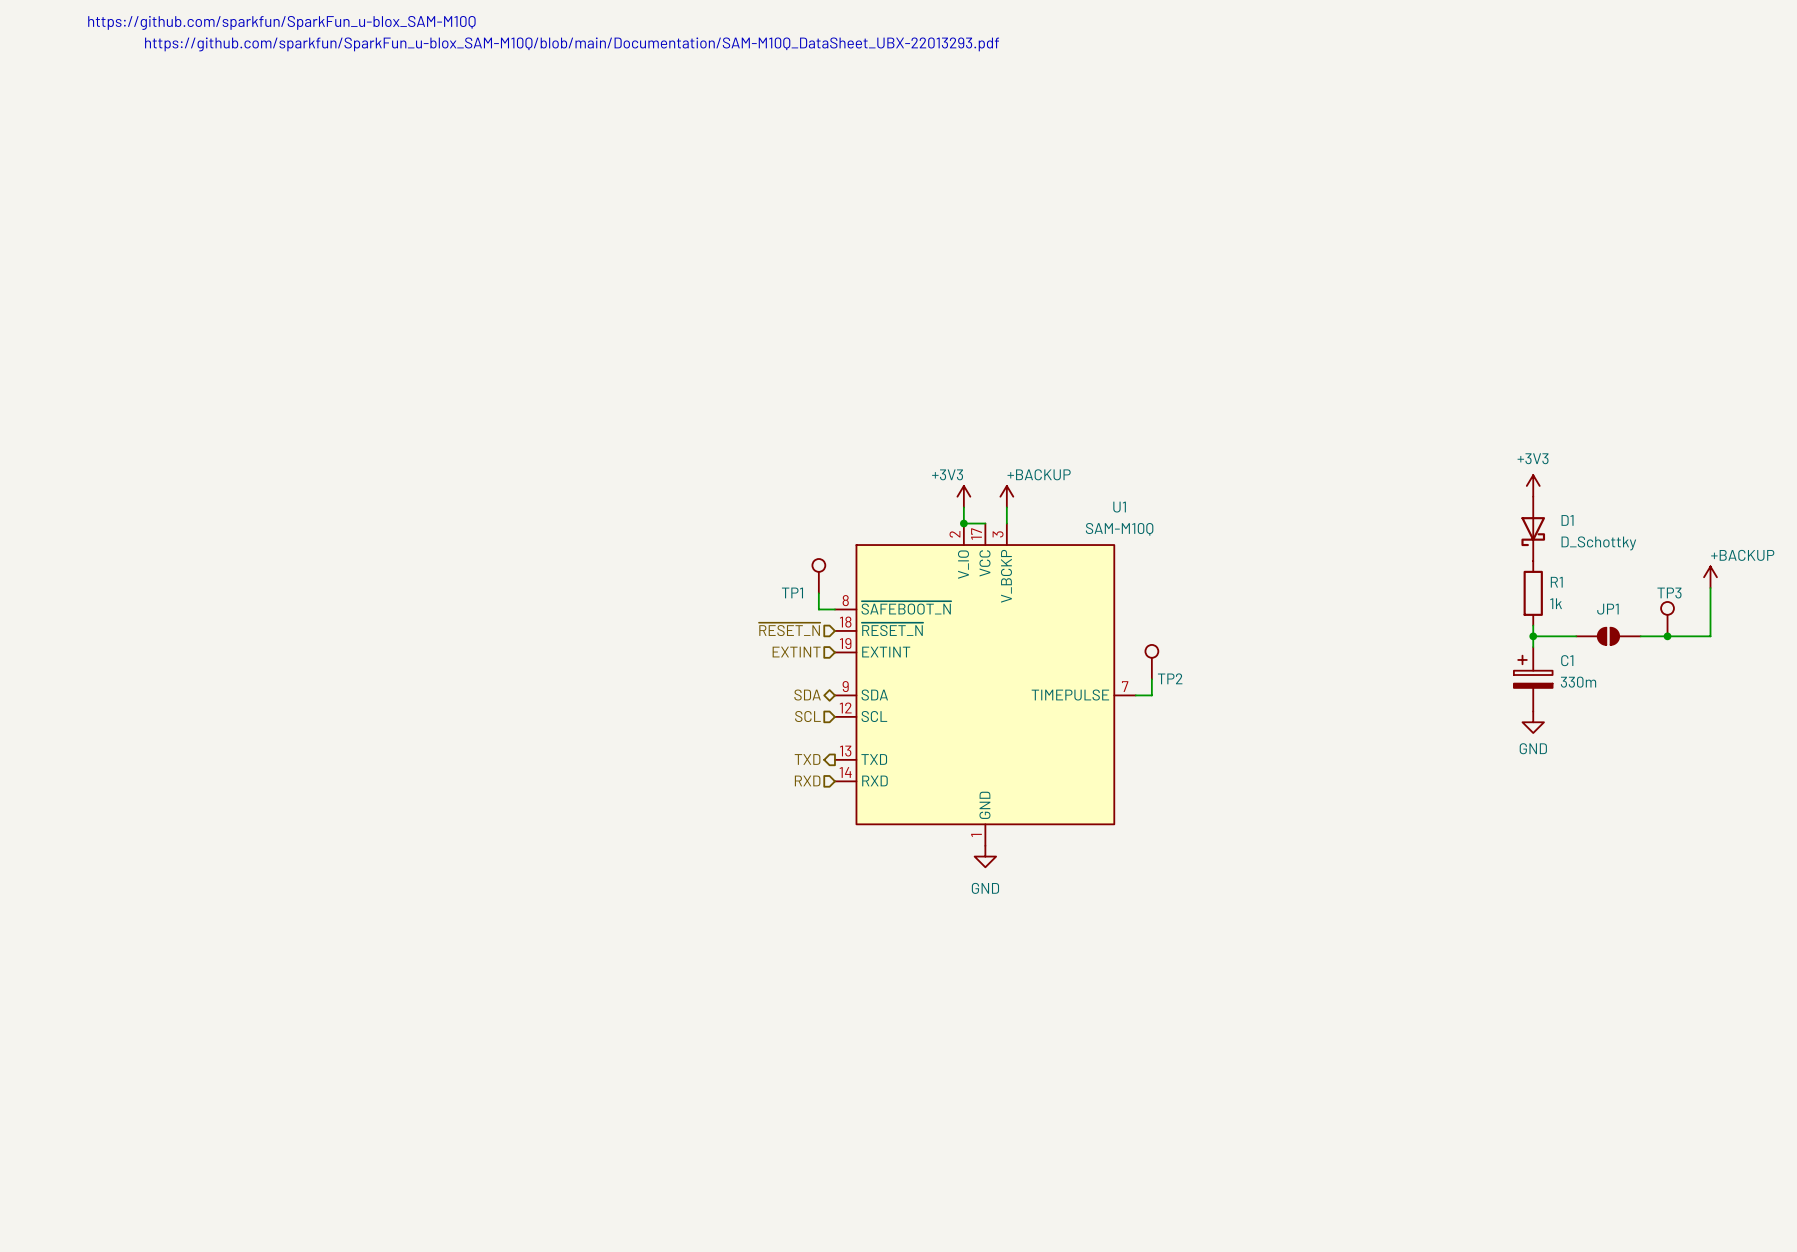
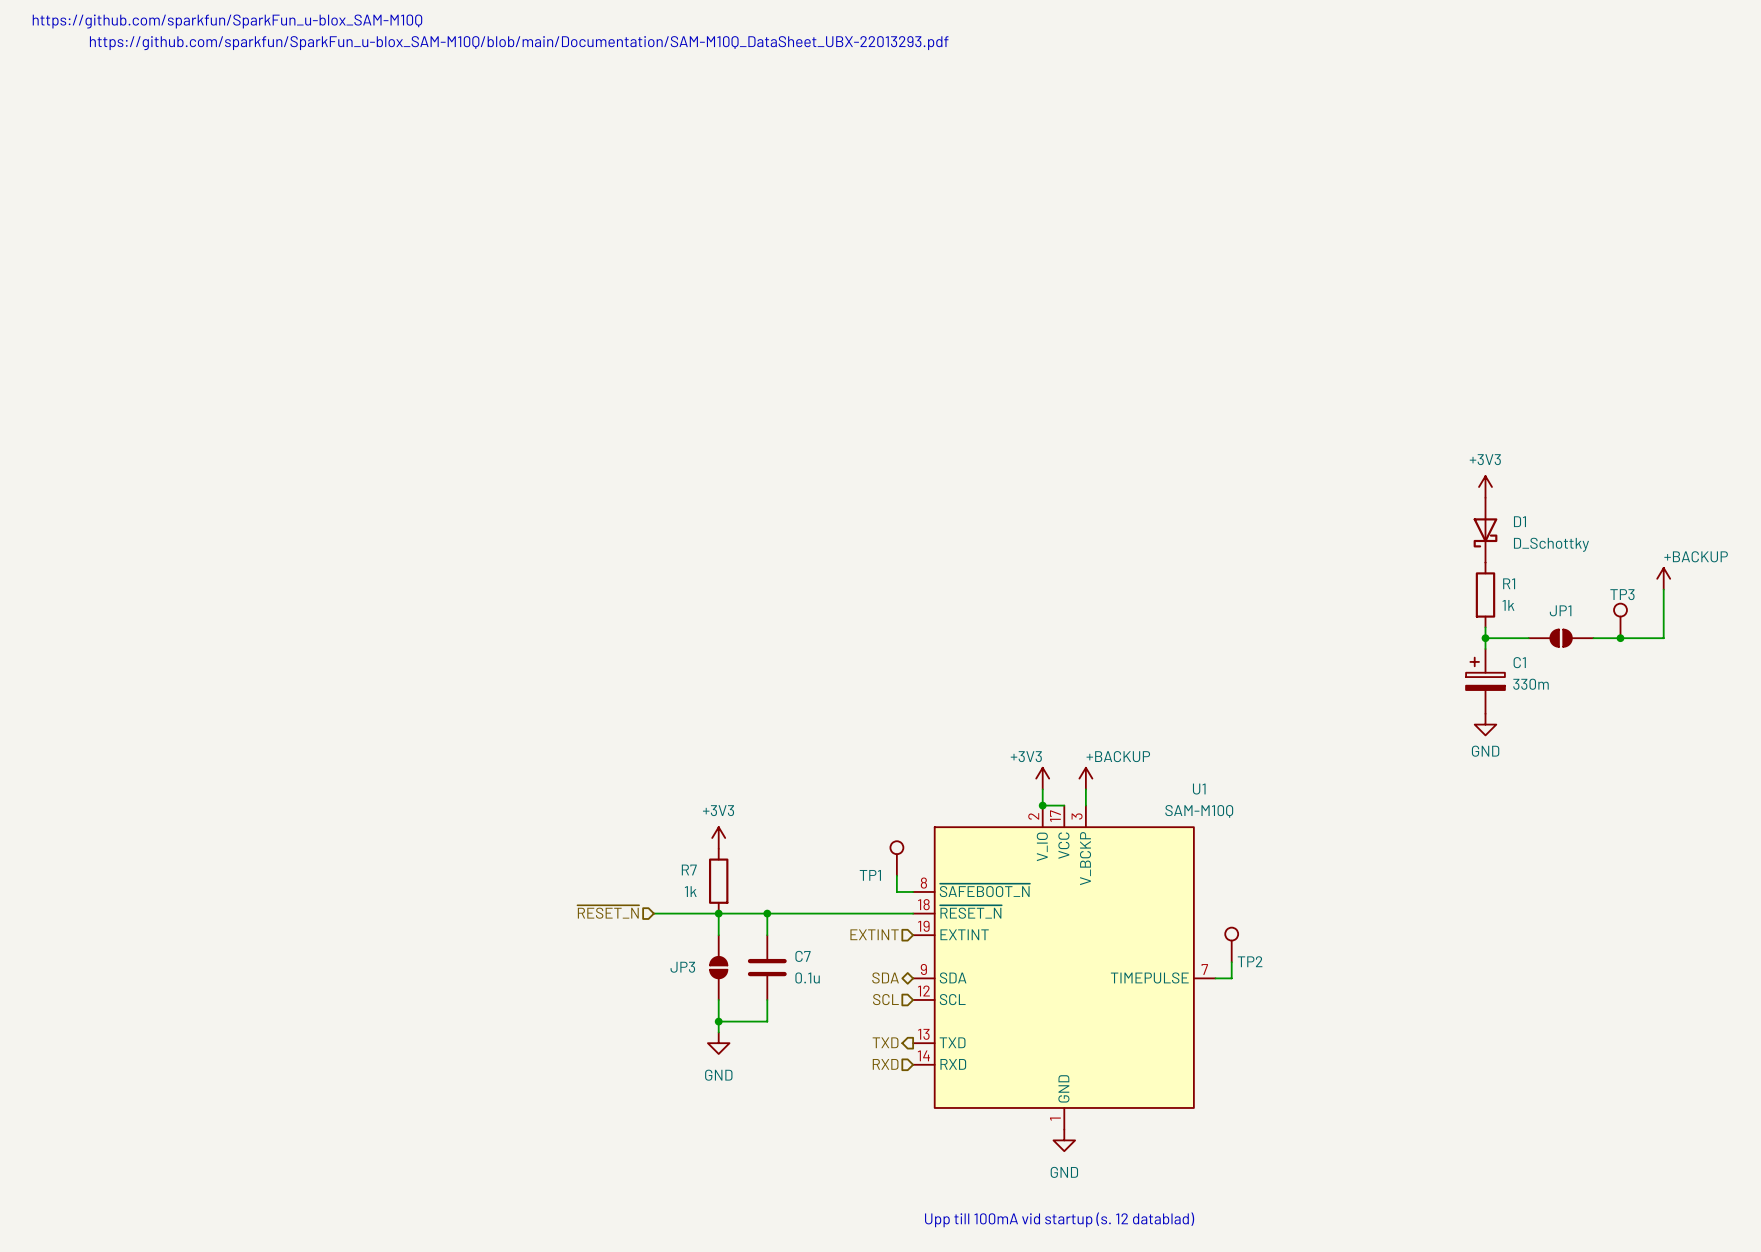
power symbol: +3V3 (963, 496) -> none
power symbol: +BACKUP (1006, 496) -> none
wire: (963, 507) (963, 523) (985, 523) -> none
wire: (1006, 507) (1006, 523) -> none
junction: (963, 523) -> none
TP1 position: (818, 576) -> (896, 858)
wire: (818, 593) (818, 609) (834, 609) -> none
hierarchical label: ~{RESET_N} (789, 629) -> none
hierarchical label: EXTINT (796, 652) -> none
TP2 position: (1151, 662) -> (1231, 944)
wire: (1151, 679) (1151, 695) (1135, 695) -> none
U1 position: (985, 684) -> (1064, 967)
hierarchical label: SDA (807, 695) -> none
hierarchical label: SCL (807, 716) -> none
hierarchical label: TXD (807, 759) -> none
power symbol: none -> +3V3 (1042, 778)
power symbol: none -> +BACKUP (1085, 778)
hierarchical label: RXD (807, 780) -> none
wire: none -> (1085, 789) (1085, 805)
junction: none -> (1042, 805)
power symbol: none -> +3V3 (718, 837)
power symbol: GND (985, 856) -> none
wire: none -> (896, 875) (896, 891) (913, 891)
R7: none -> 1k (718, 881)
hierarchical label: none -> ~{RESET_N} (608, 912)
wire: none -> (653, 913) (913, 913)
wire: none -> (718, 913) (718, 935)
junction: none -> (718, 913)
wire: none -> (767, 913) (767, 935)
junction: none -> (767, 913)
hierarchical label: none -> EXTINT (874, 934)
wire: none -> (1231, 962) (1231, 978) (1215, 978)
JP3: none -> (718, 967)
C7: none -> 0.1u (767, 967)
hierarchical label: none -> SDA (885, 977)
hierarchical label: none -> SCL (885, 999)
wire: none -> (718, 999) (718, 1032)
wire: none -> (767, 999) (767, 1021) (718, 1021)
junction: none -> (718, 1021)
hierarchical label: none -> TXD (885, 1042)
power symbol: none -> GND (718, 1043)
hierarchical label: none -> RXD (885, 1064)
power symbol: none -> GND (1064, 1140)
text: none -> Upp till 100mA vid startup (s. 12 datablad) (1059, 1219)

